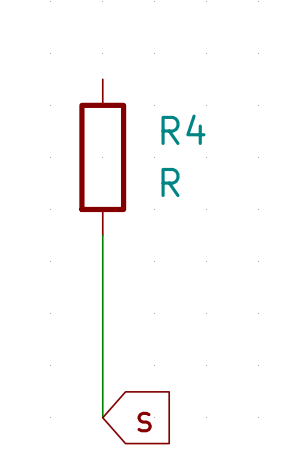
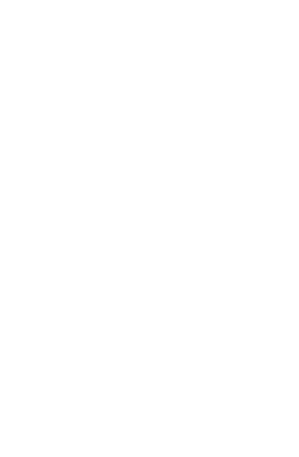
R4: R (102, 157) -> none
wire: (102, 235) (102, 417) -> none
global label: s (144, 422) -> none

